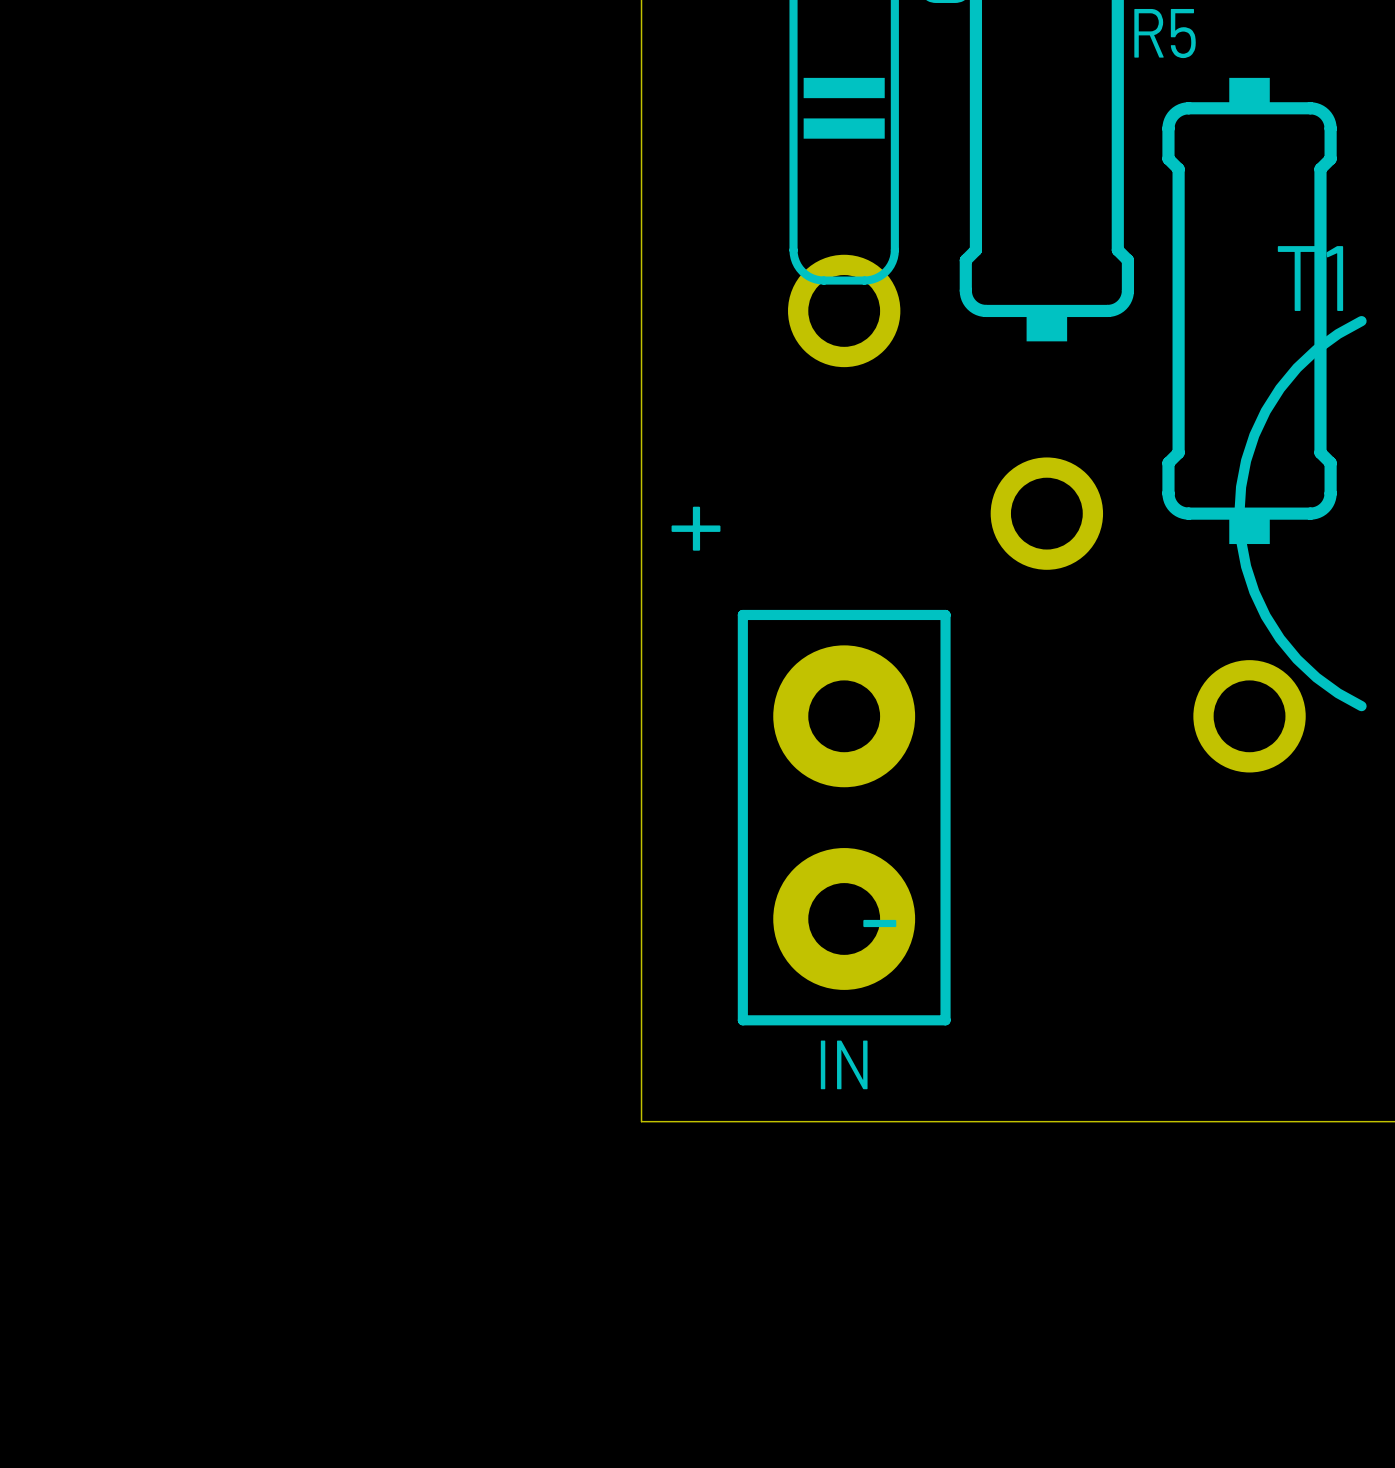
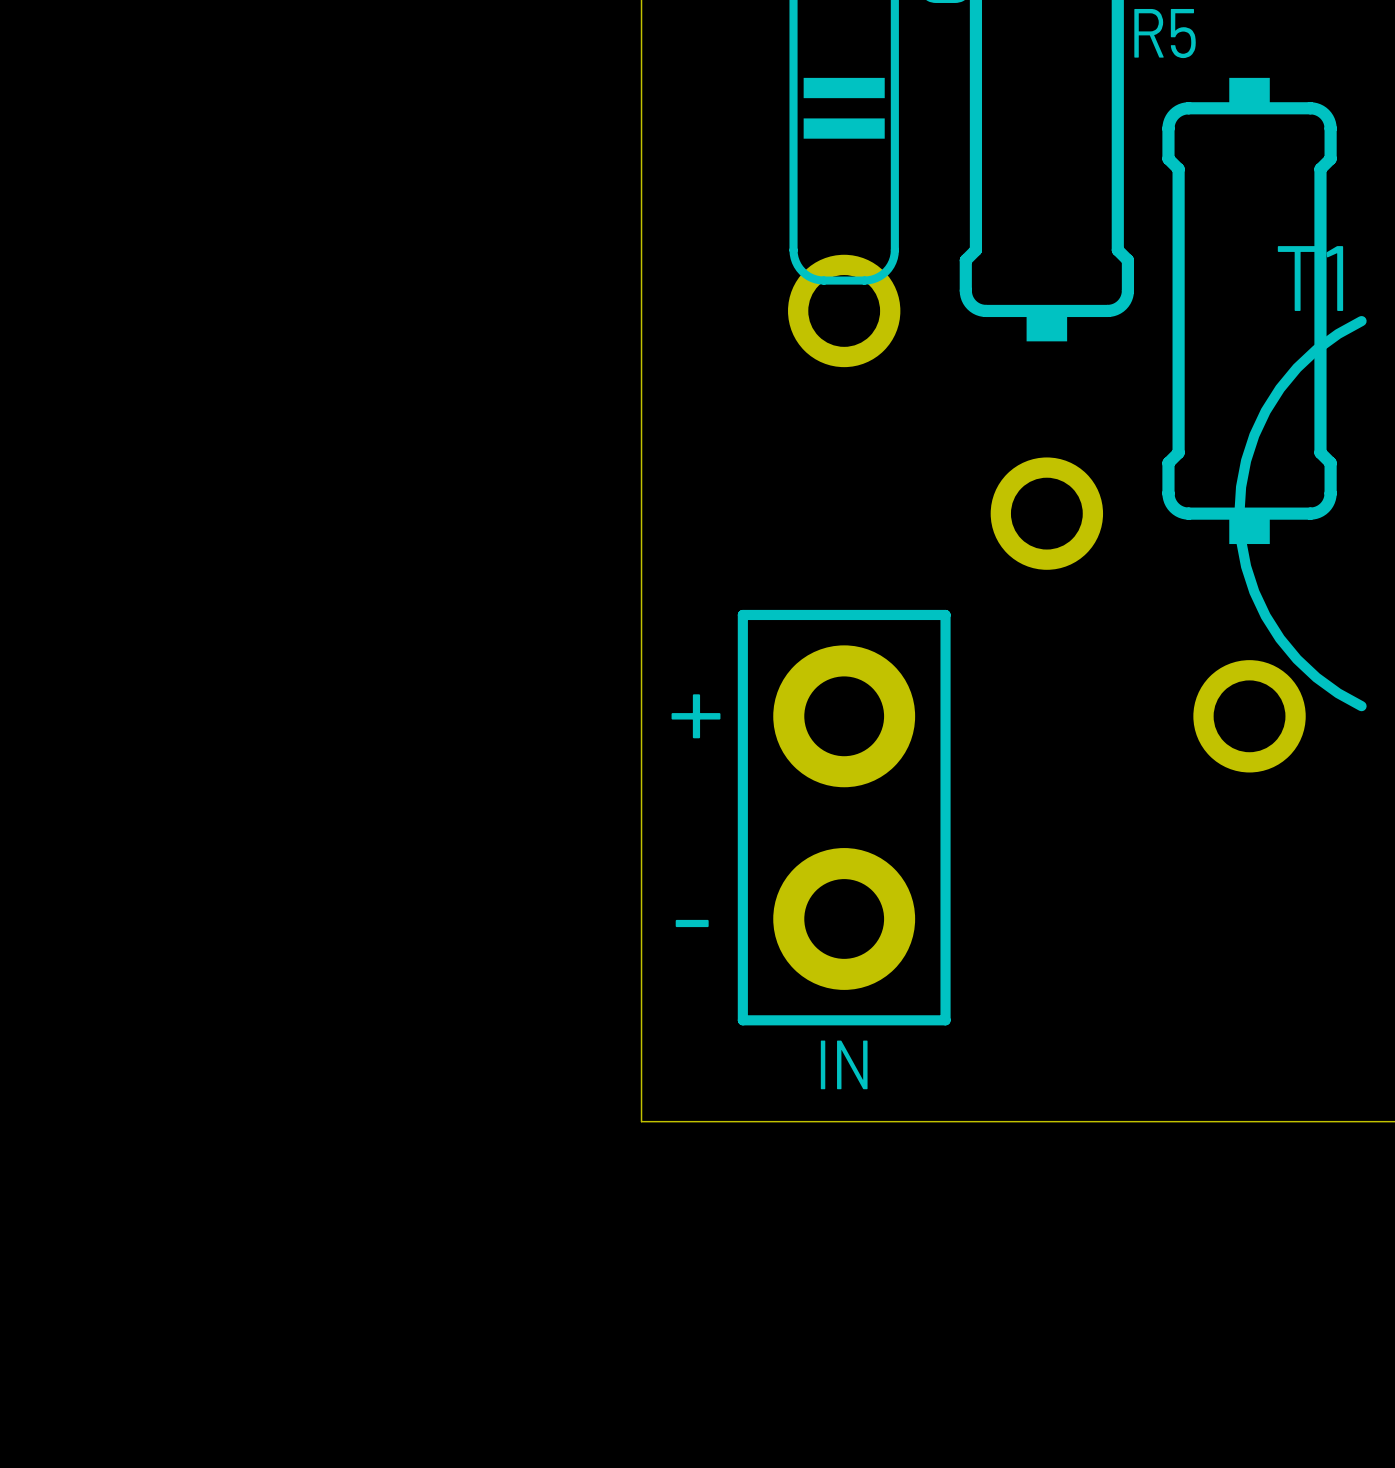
IN footprint: [737, 609, 951, 1026] -> [737, 609, 951, 1026]

